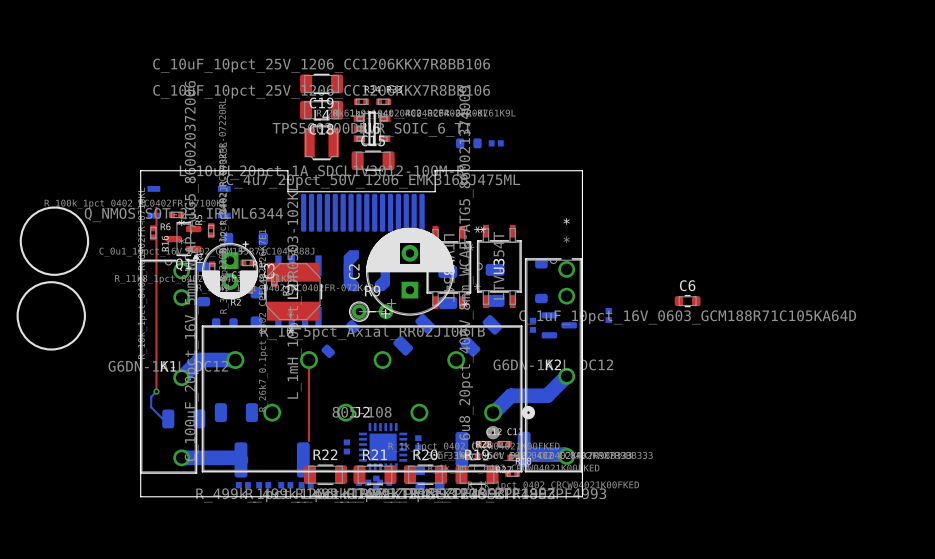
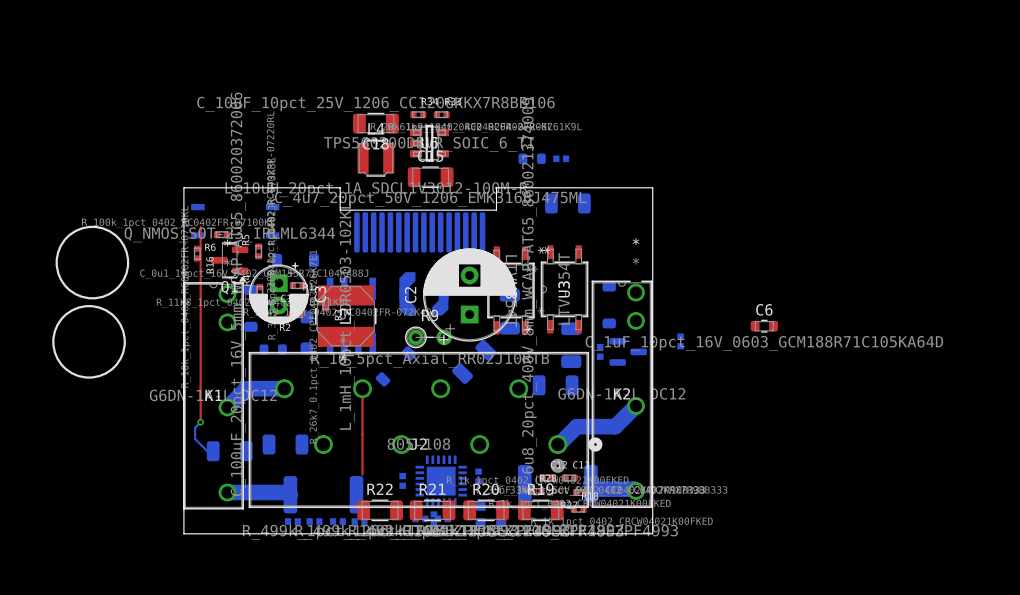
C19 side: top (321, 83) -> bottom (567, 203)
part position: (495, 285) -> (571, 345)
part: (481, 335) -> none
part: none -> (555, 385)

